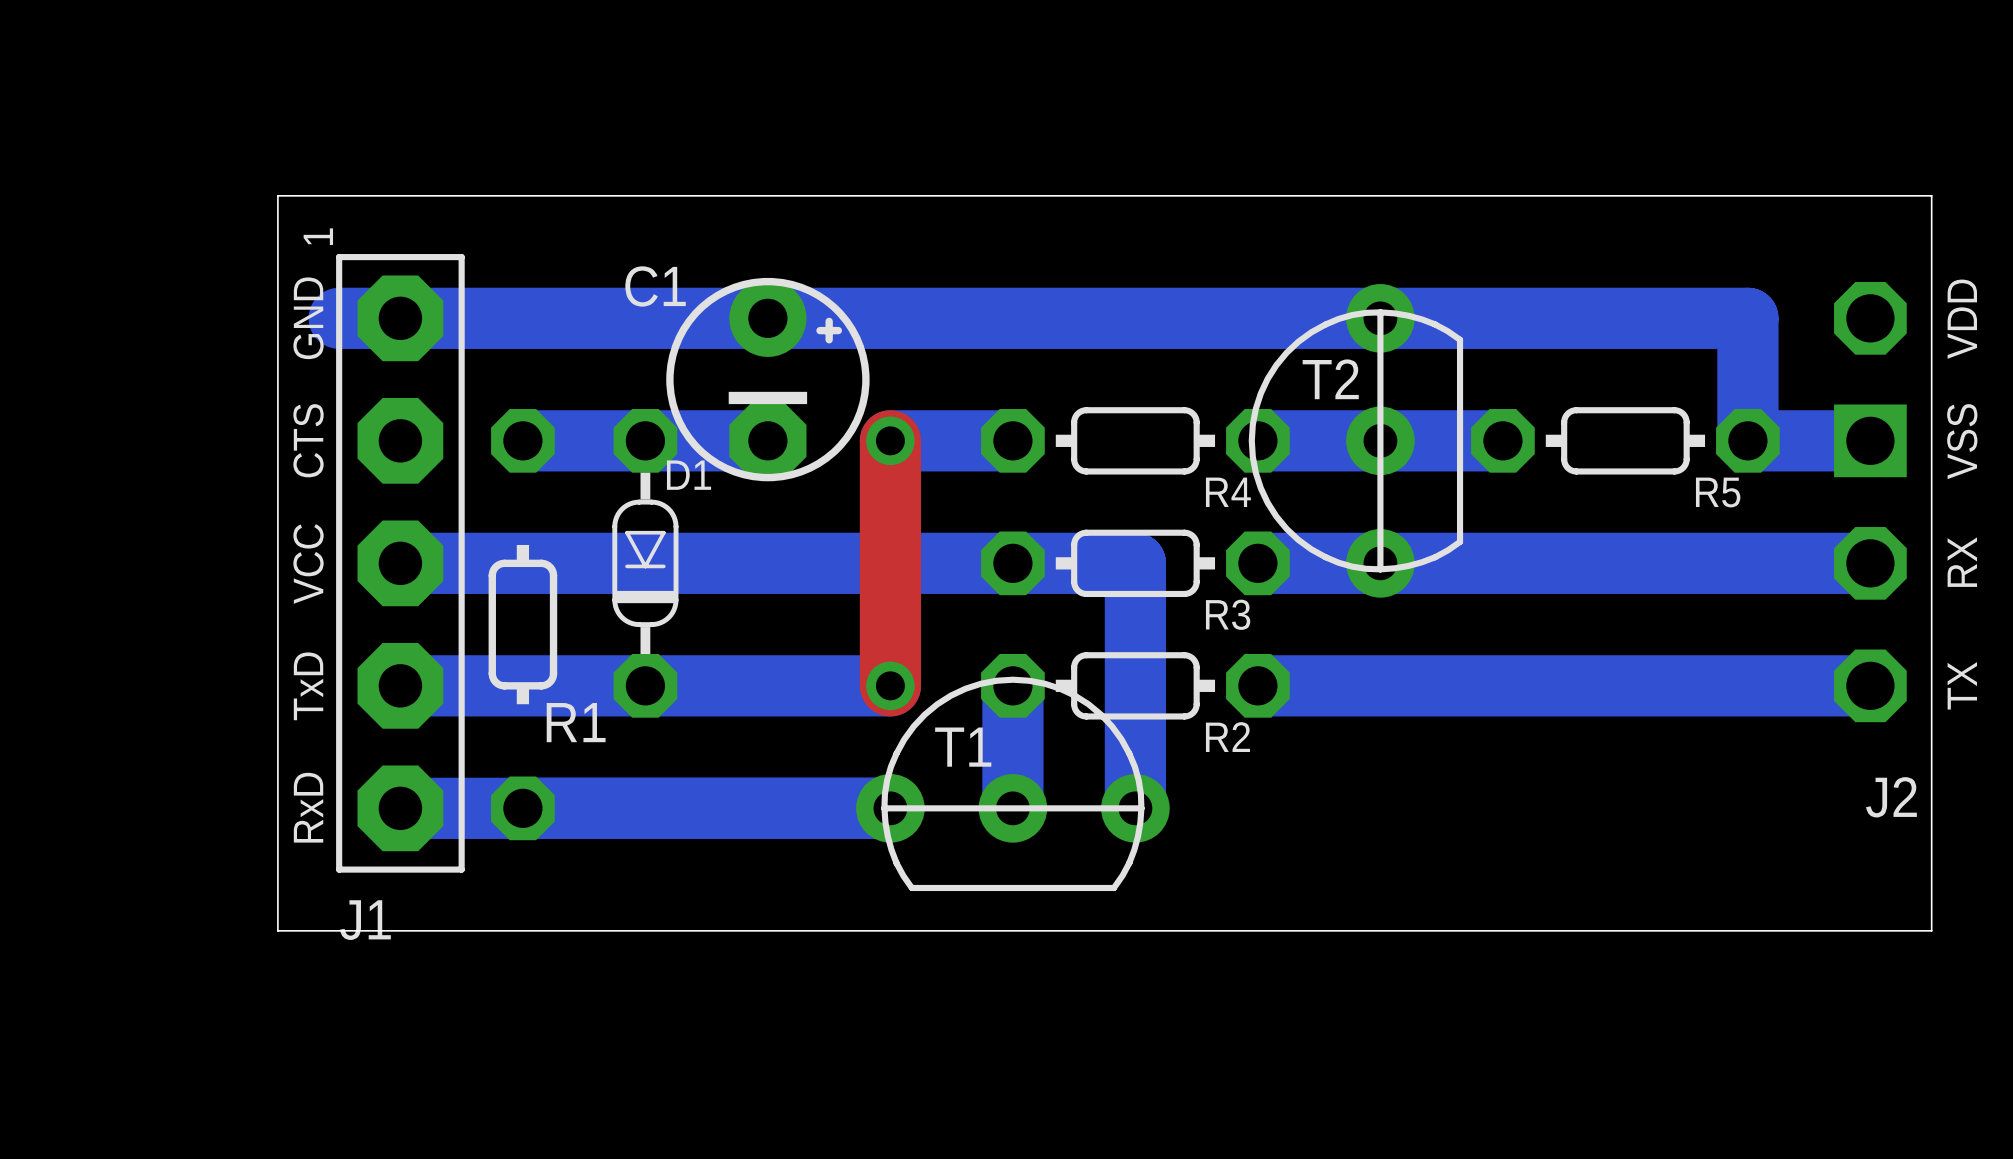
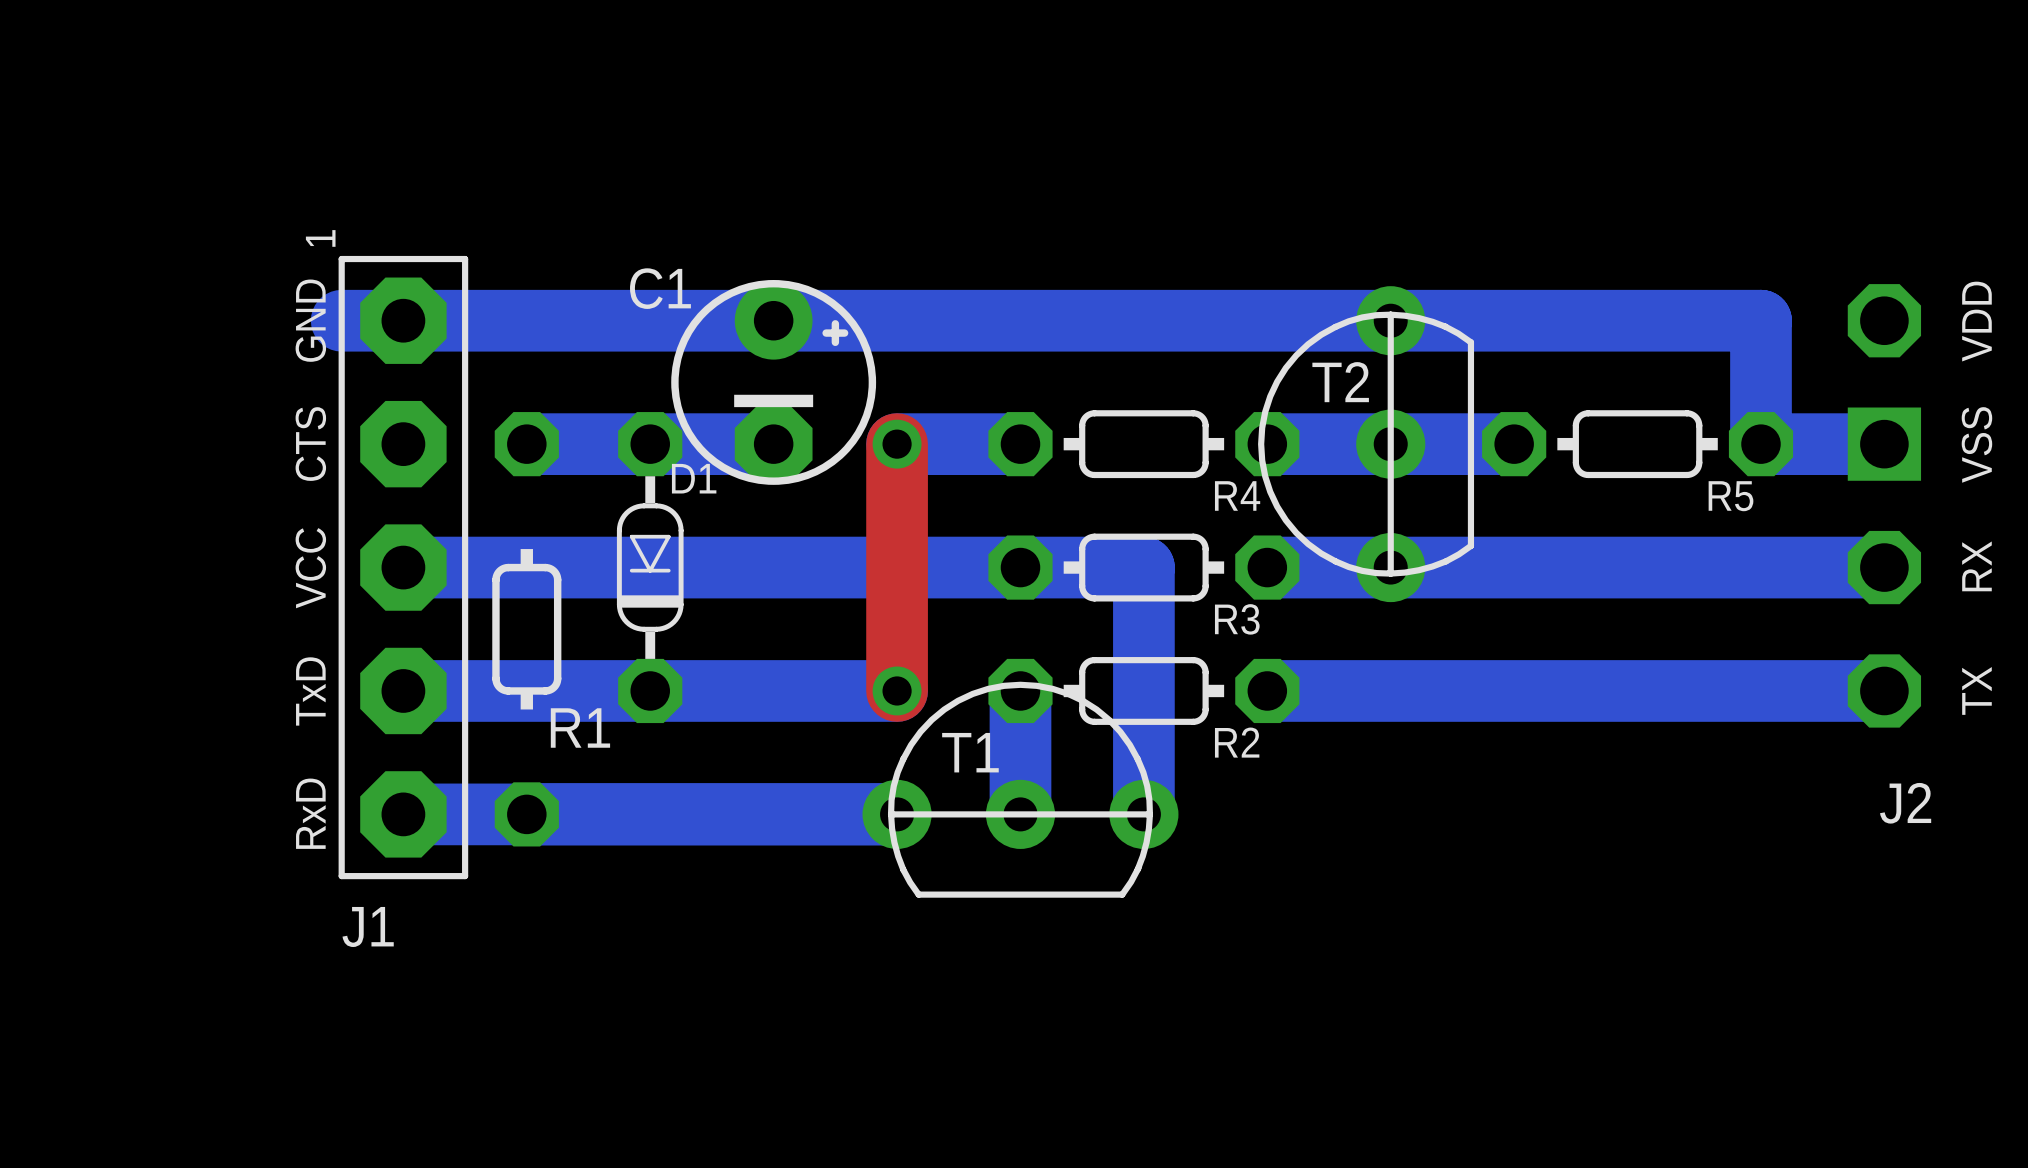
board edge: (277, 195) (1931, 195) (1931, 930) (277, 930) (277, 195) -> none

